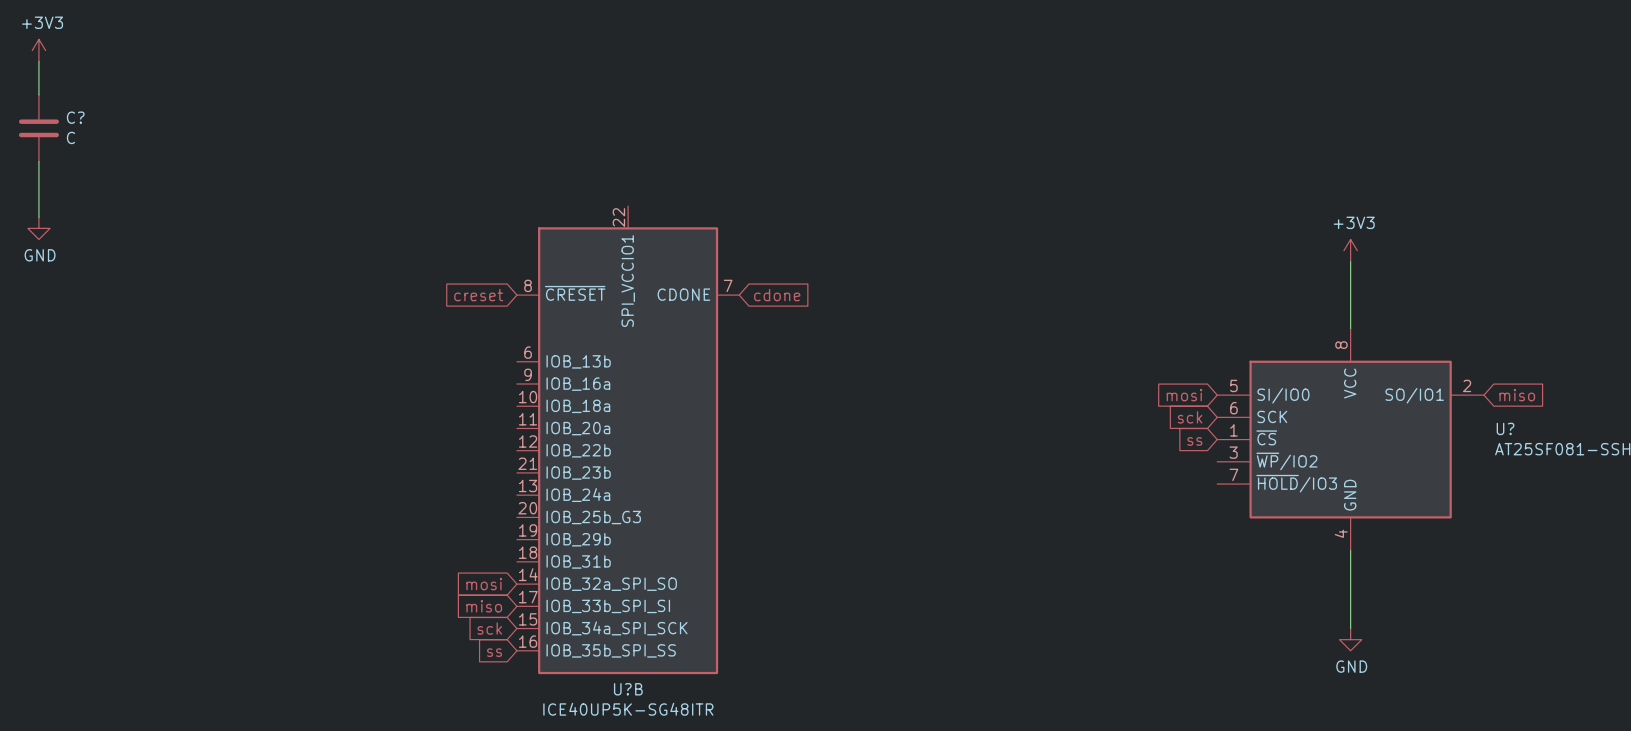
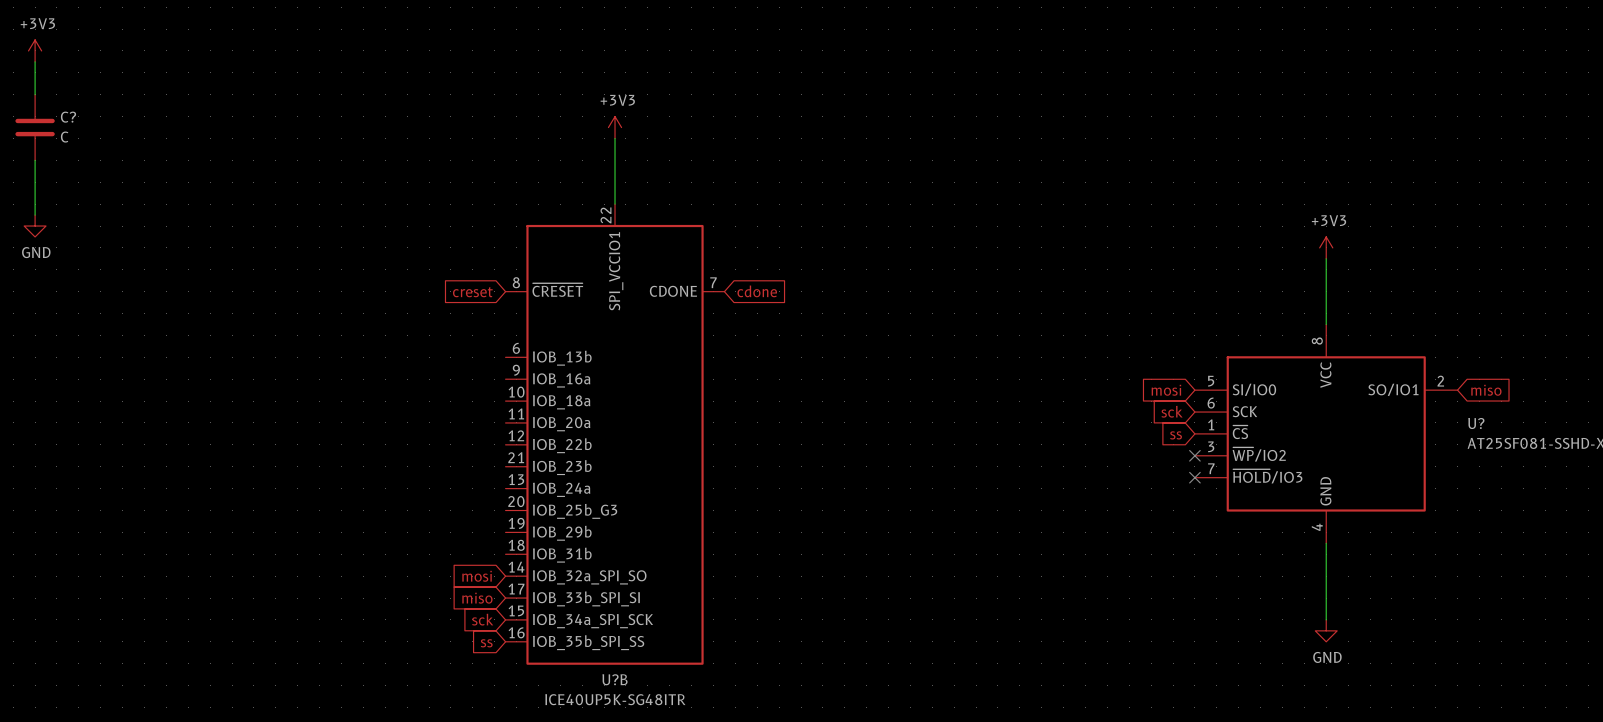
power symbol: none -> +3V3 (615, 127)
wire: none -> (615, 138) (615, 204)
no-connect mark: none -> (1194, 455)
no-connect mark: none -> (1194, 477)

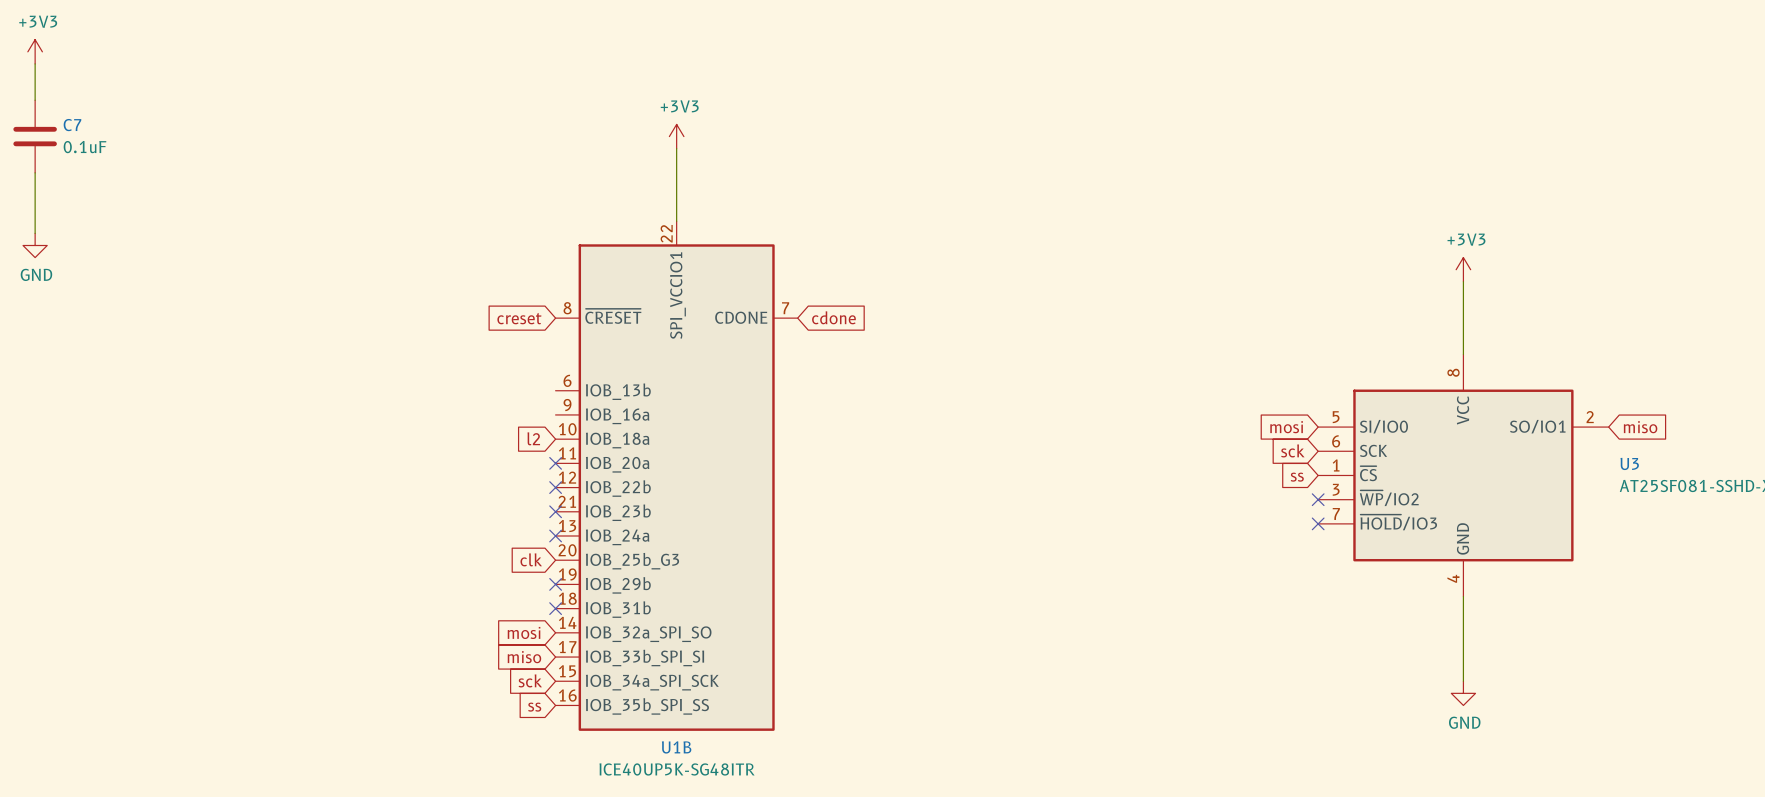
C? name: C? (68, 117) -> C7 (72, 125)
C? value: C (64, 137) -> 0.1uF (85, 147)
global label: none -> l2 (533, 438)
no-connect mark: none -> (555, 463)
U? name: U? (1476, 423) -> U3 (1629, 463)
no-connect mark: none -> (555, 487)
no-connect mark: none -> (555, 511)
no-connect mark: none -> (555, 536)
global label: none -> clk (531, 559)
no-connect mark: none -> (555, 584)
no-connect mark: none -> (555, 608)
U?B name: U?B (614, 679) -> U1B (676, 747)

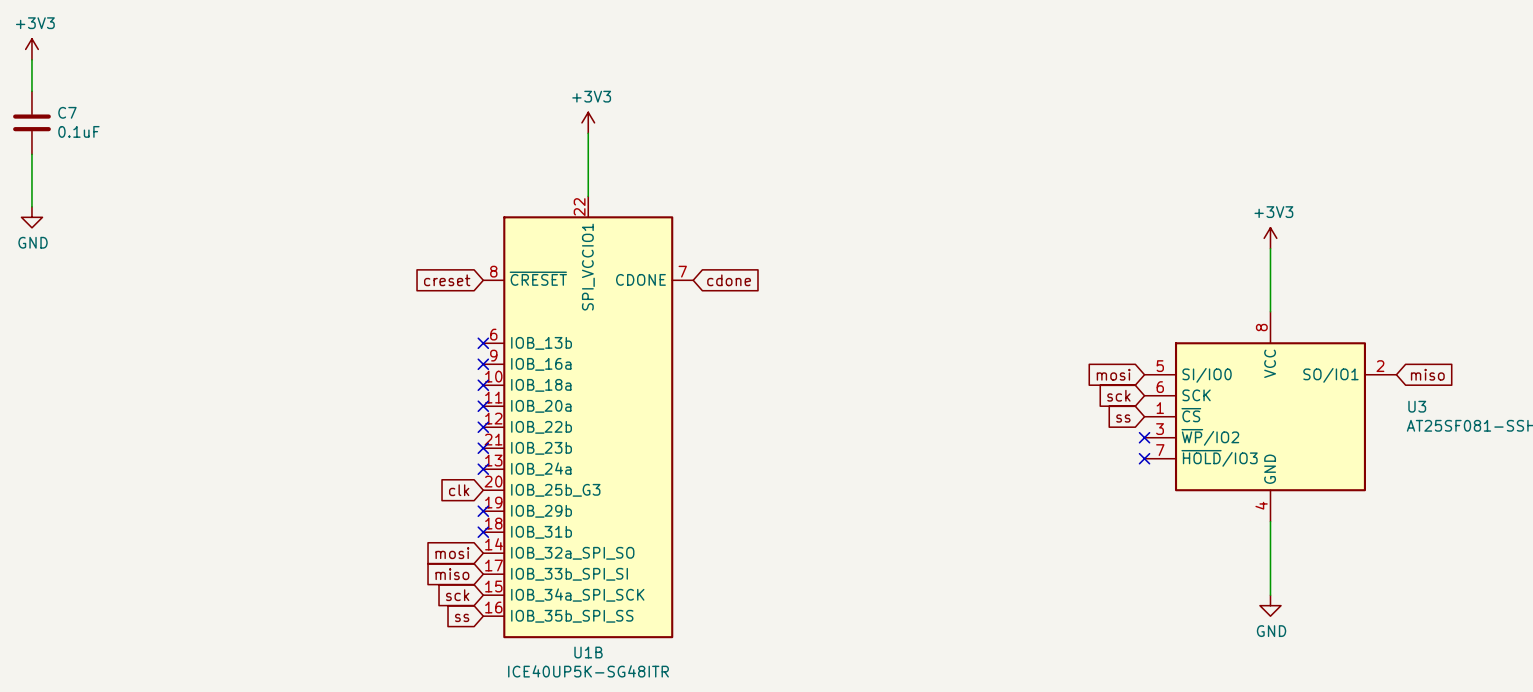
no-connect mark: none -> (483, 343)
no-connect mark: none -> (483, 364)
global label: l2 (533, 438) -> none
no-connect mark: none -> (483, 385)

